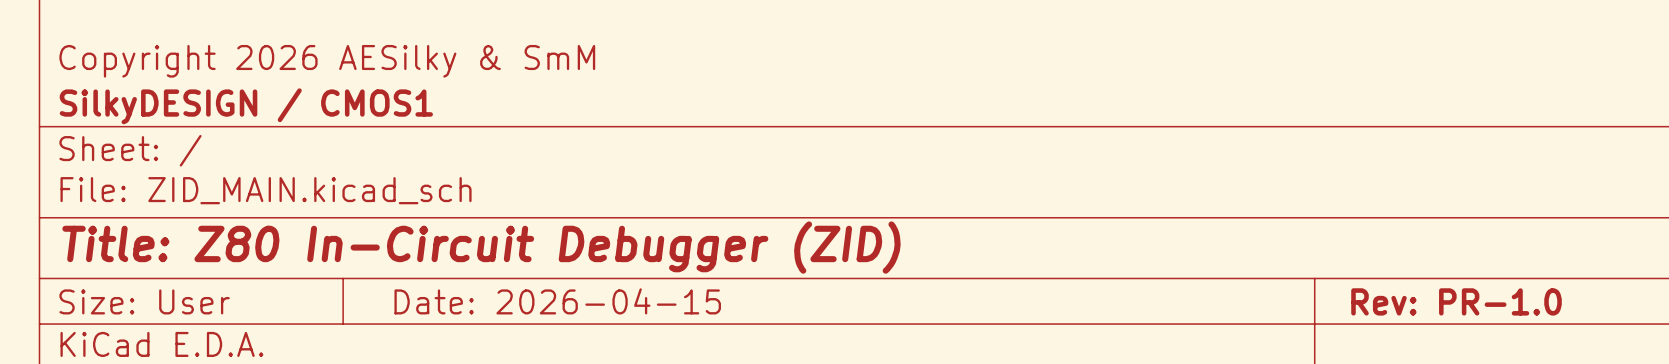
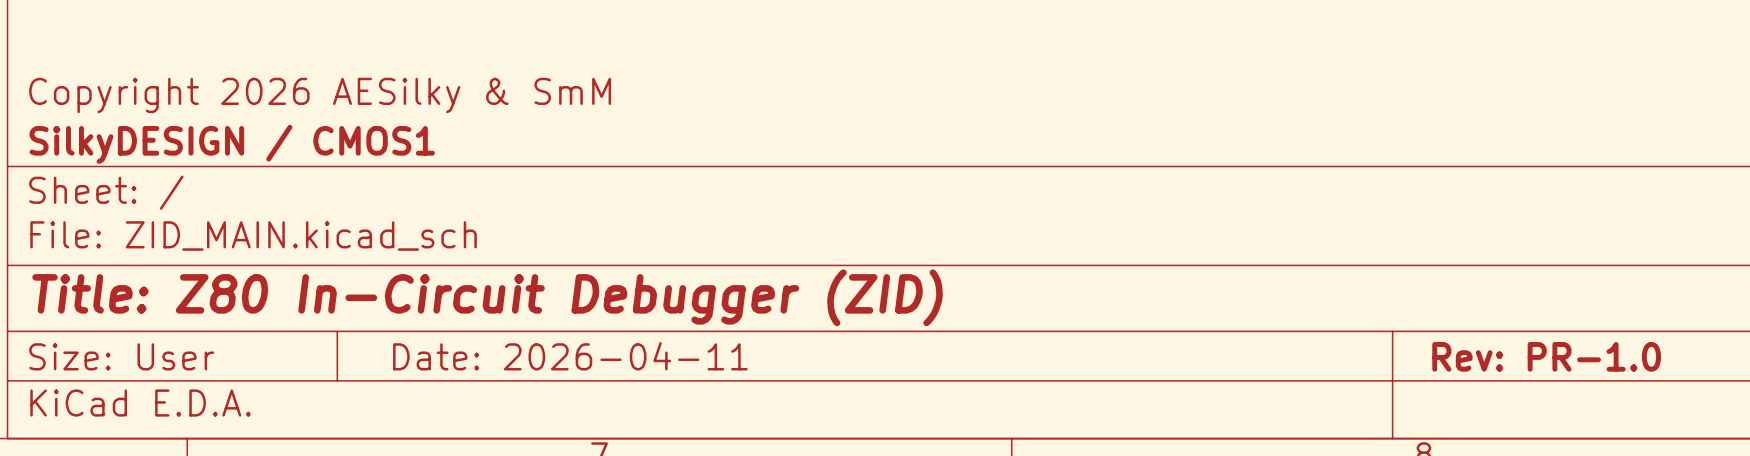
title block: Date: 2026-04-15 (557, 301) -> Date: 2026-04-11 (570, 356)

